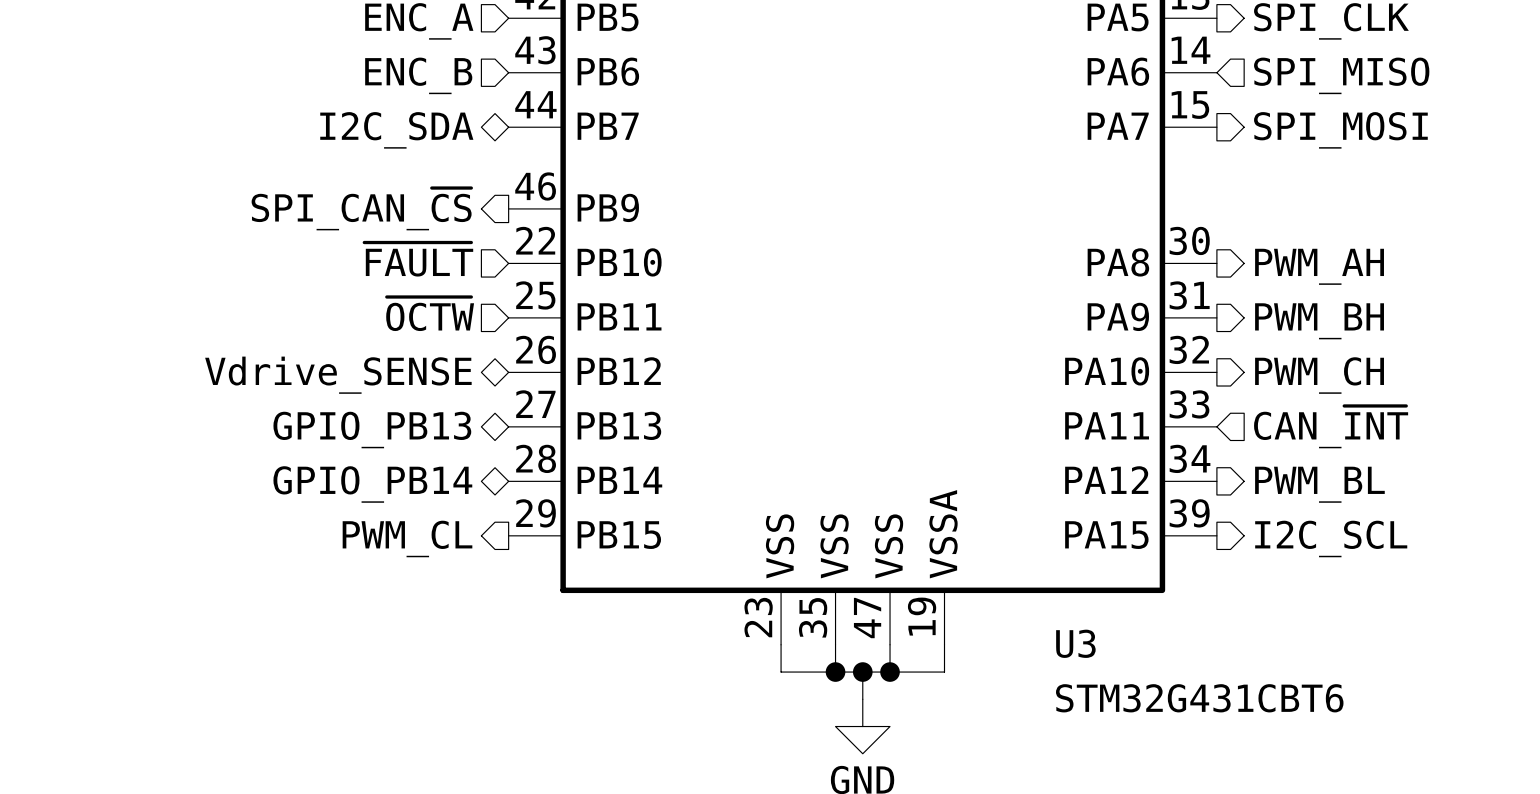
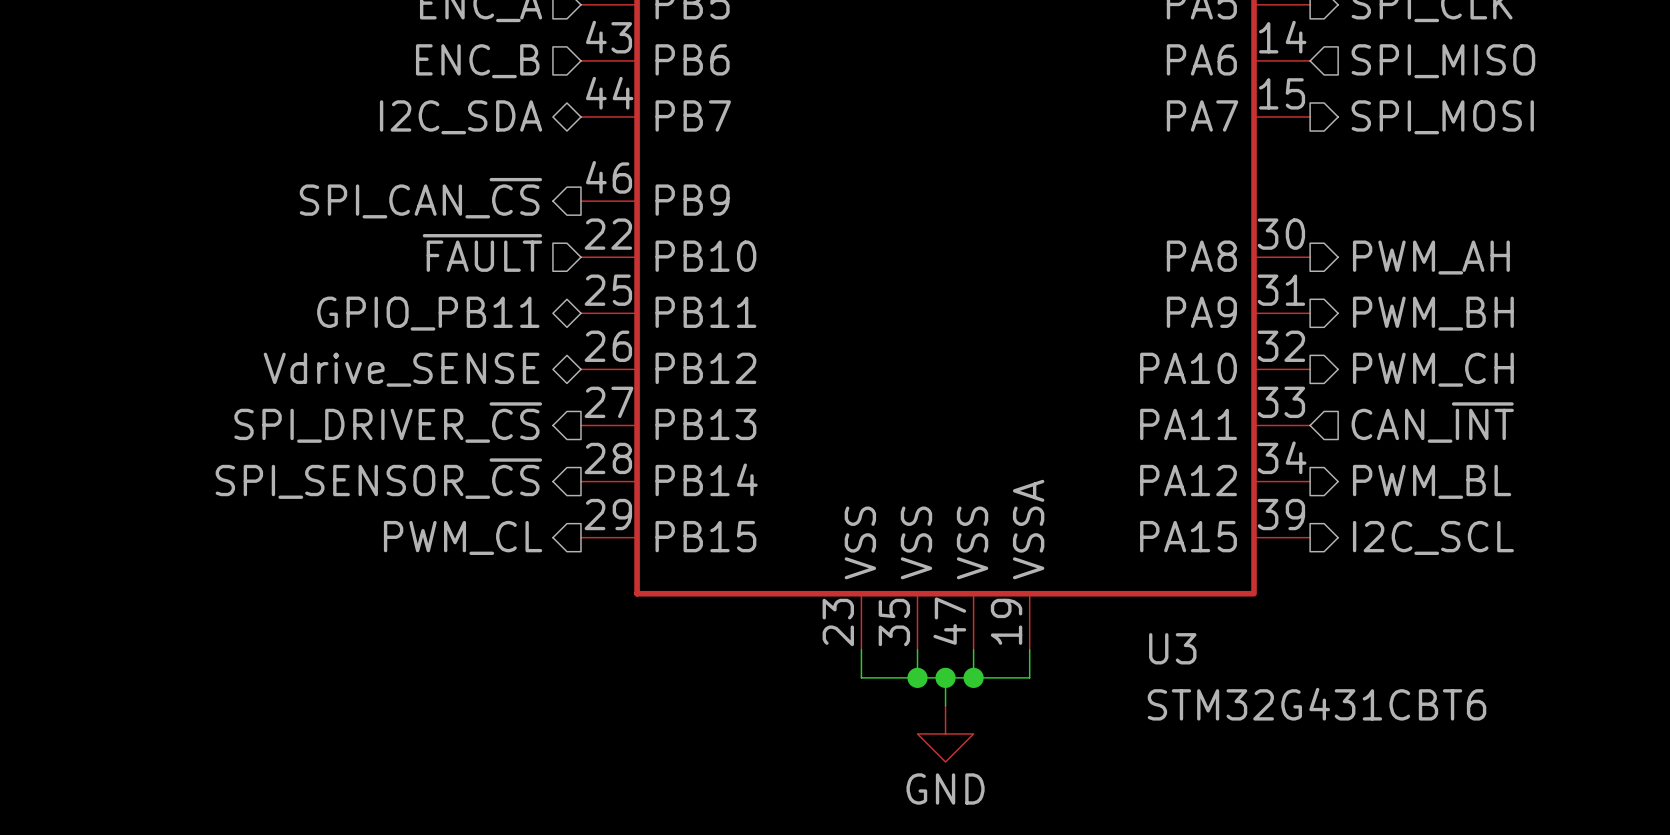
hierarchical label shape: input (430, 314) -> bidirectional (428, 313)
hierarchical label: ~{OCTW} (430, 314) -> GPIO_PB11 (428, 313)
hierarchical label shape: bidirectional (372, 430) -> output (388, 422)
hierarchical label: GPIO_PB13 (372, 430) -> SPI_DRIVER_~{CS} (388, 422)
hierarchical label shape: bidirectional (372, 484) -> output (378, 478)
hierarchical label: GPIO_PB14 (372, 484) -> SPI_SENSOR_~{CS} (378, 478)

